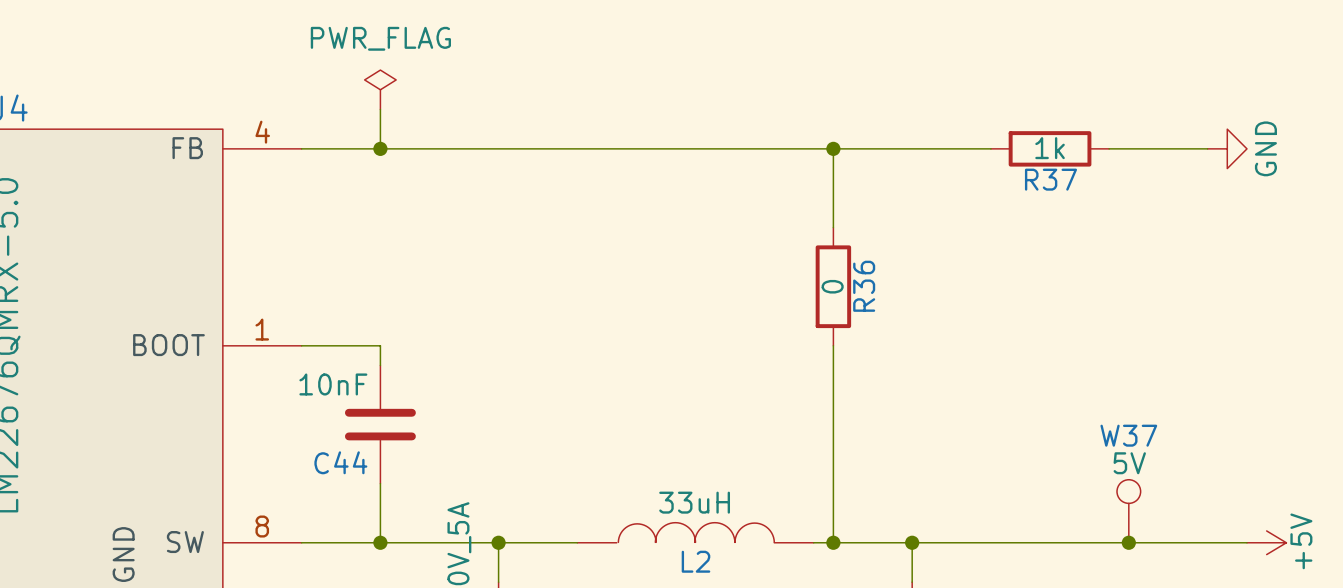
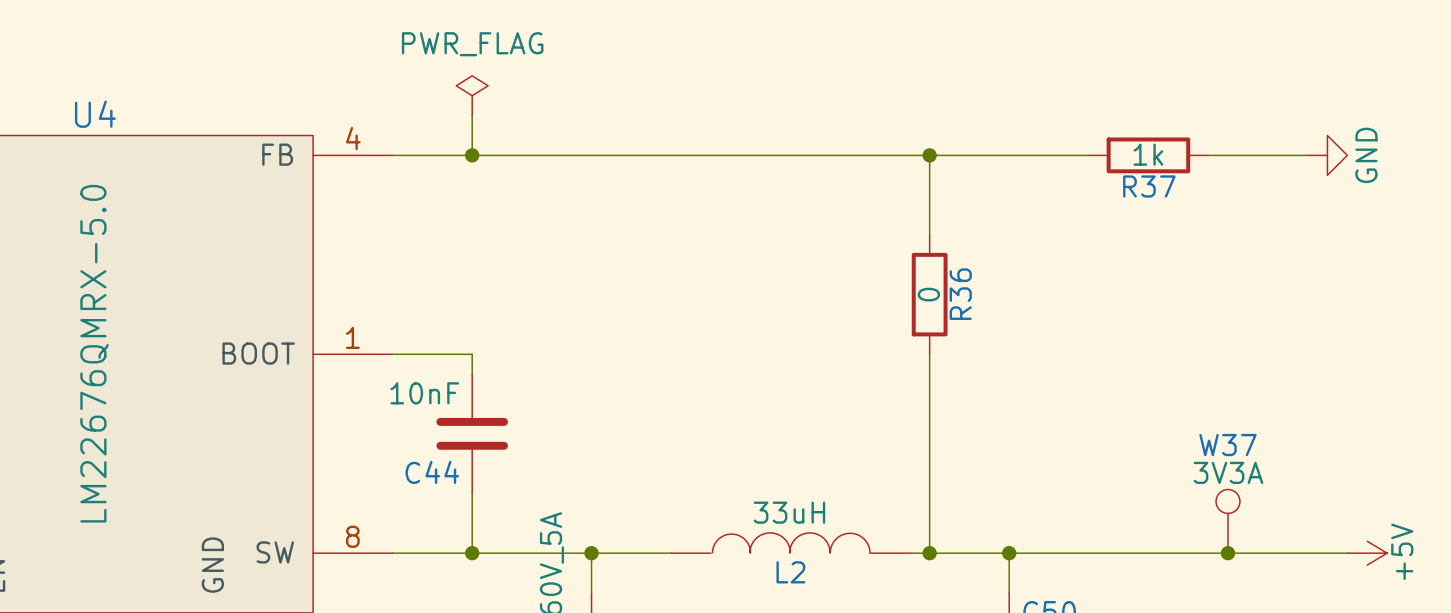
W37 value: 5V (1129, 463) -> 3V3A (1228, 472)

